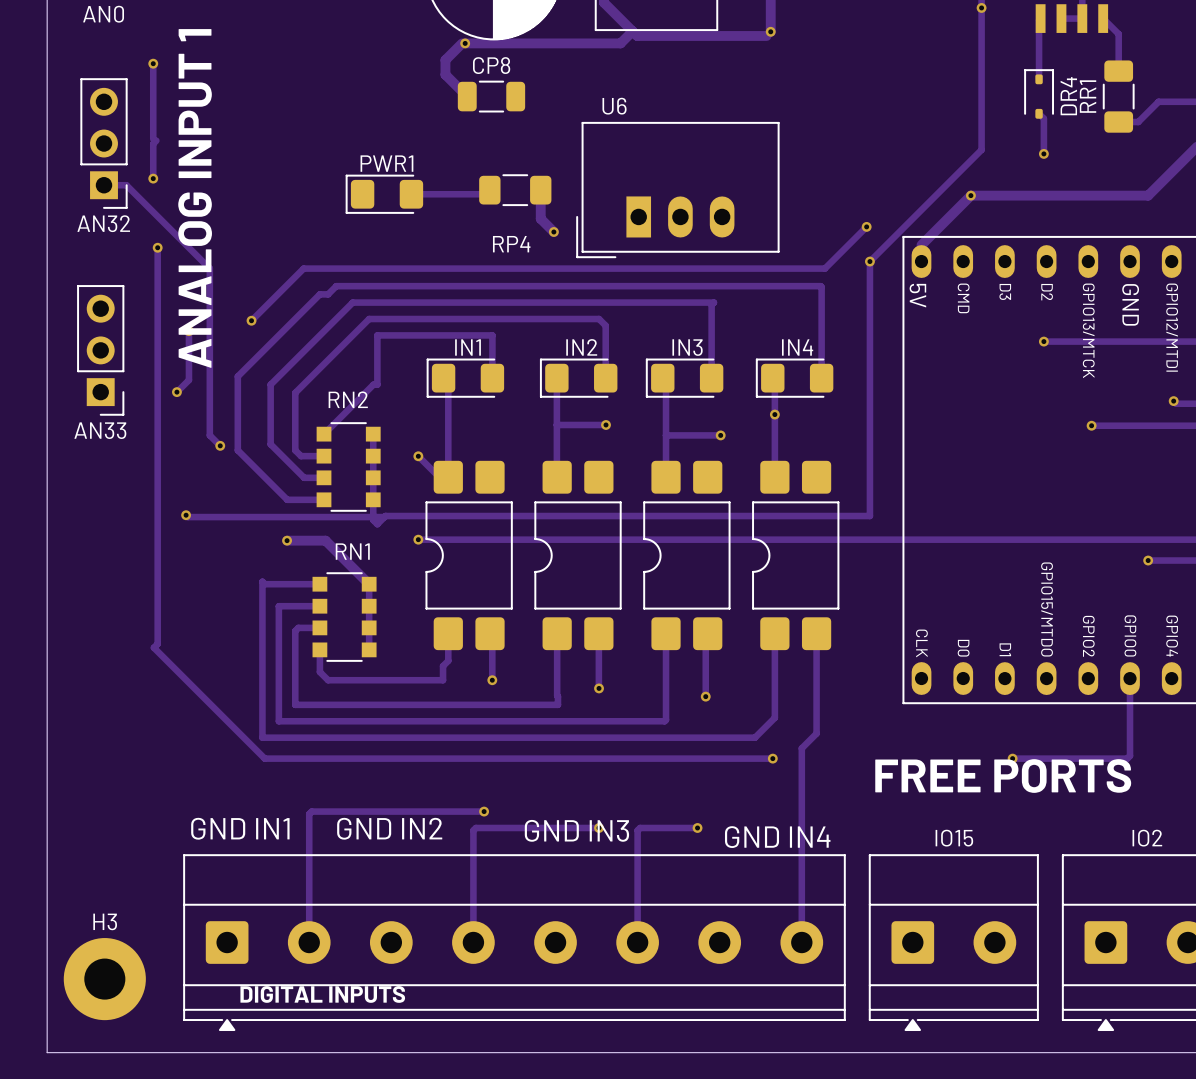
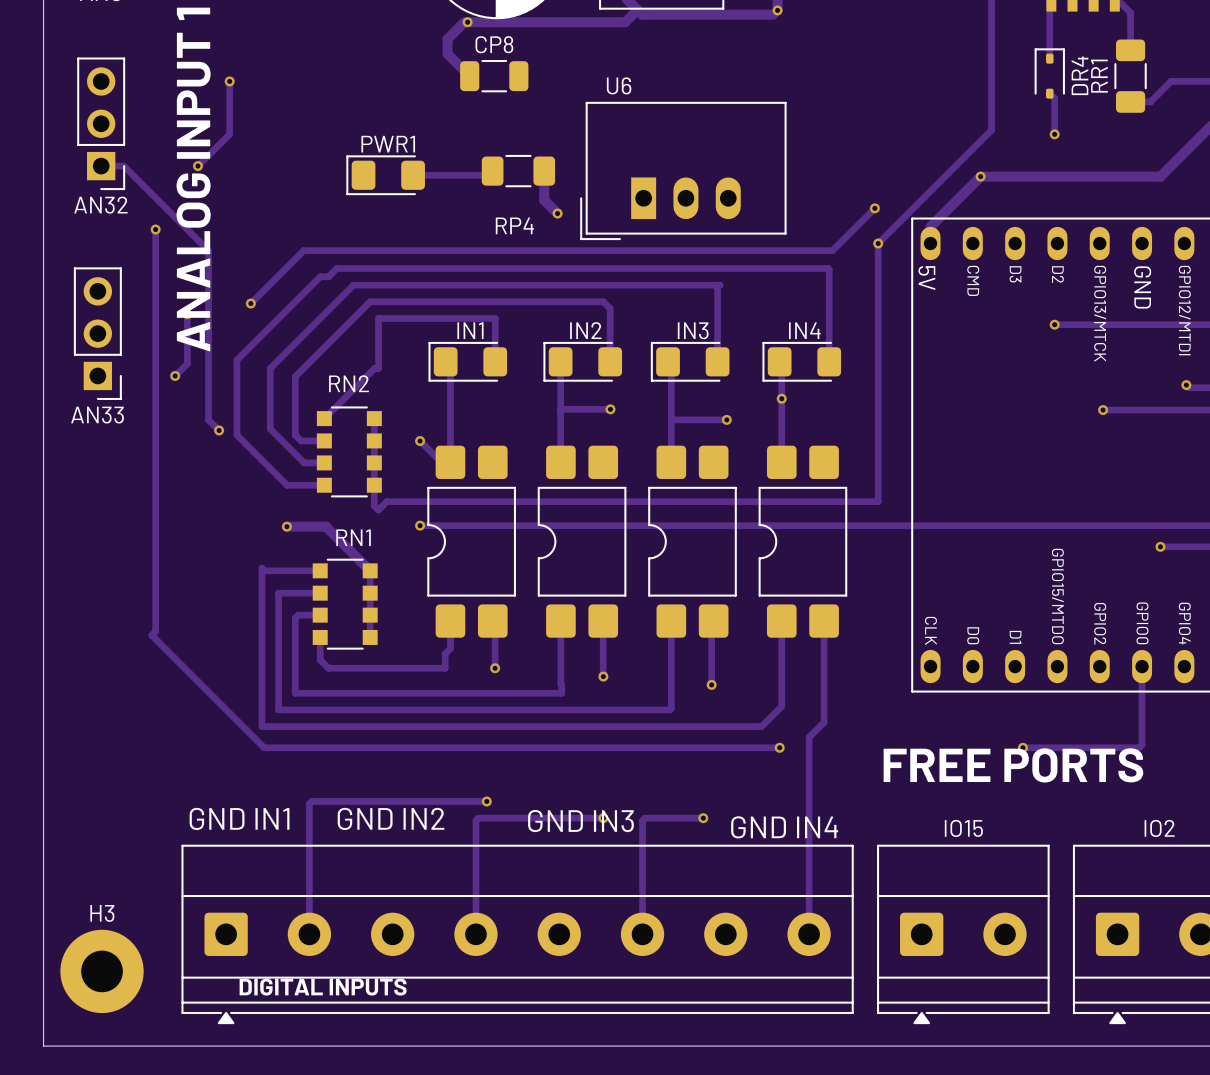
track: (153, 63) (153, 139) -> none
via: (153, 63) -> none
track: none -> (229, 81) (229, 134) (197, 166)
via: none -> (229, 81)
track: (156, 140) (153, 143) (153, 178) -> none
via position: (153, 178) -> (197, 166)
track: (186, 515) (187, 517) (384, 517) -> none
via: (186, 515) -> none

